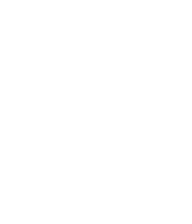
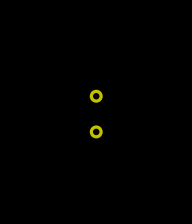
part: none -> (96, 114)

